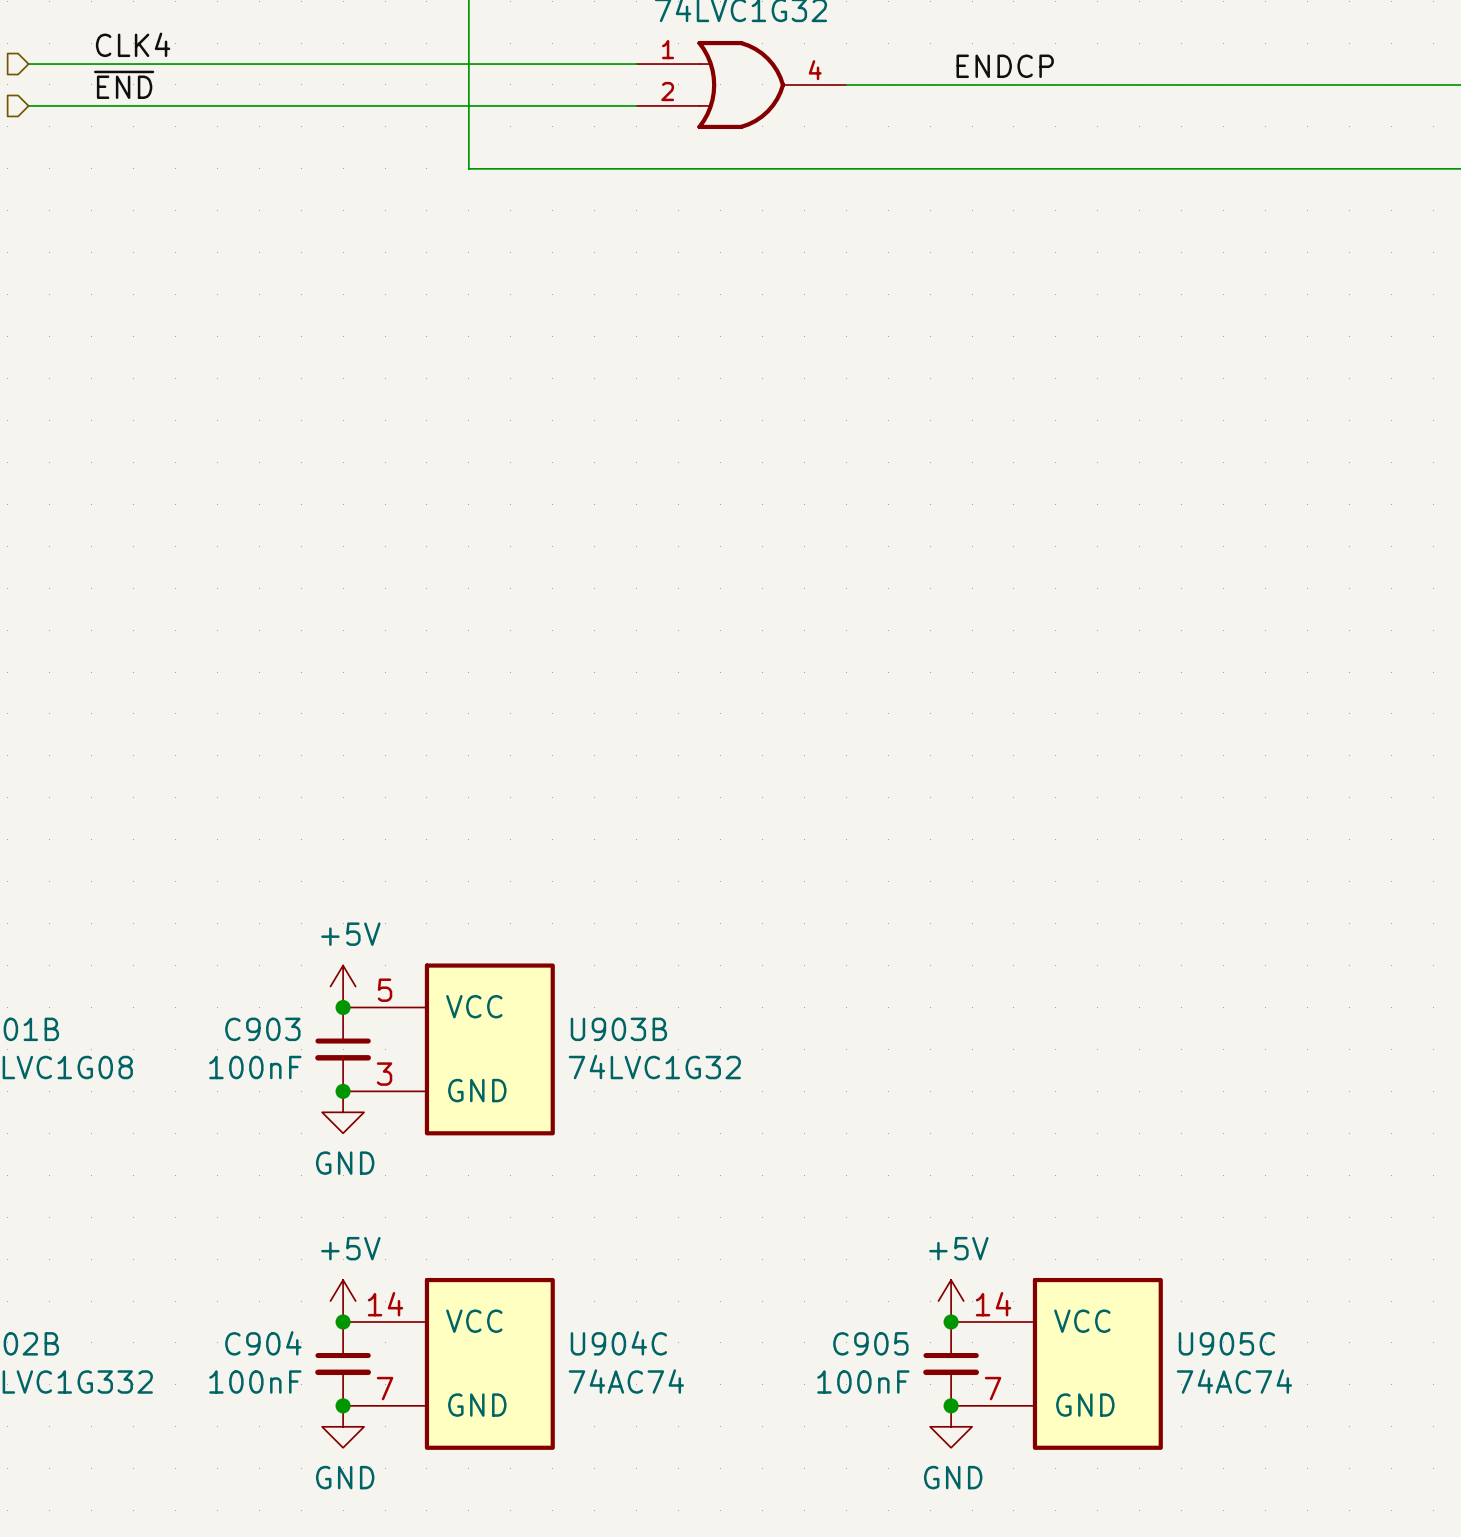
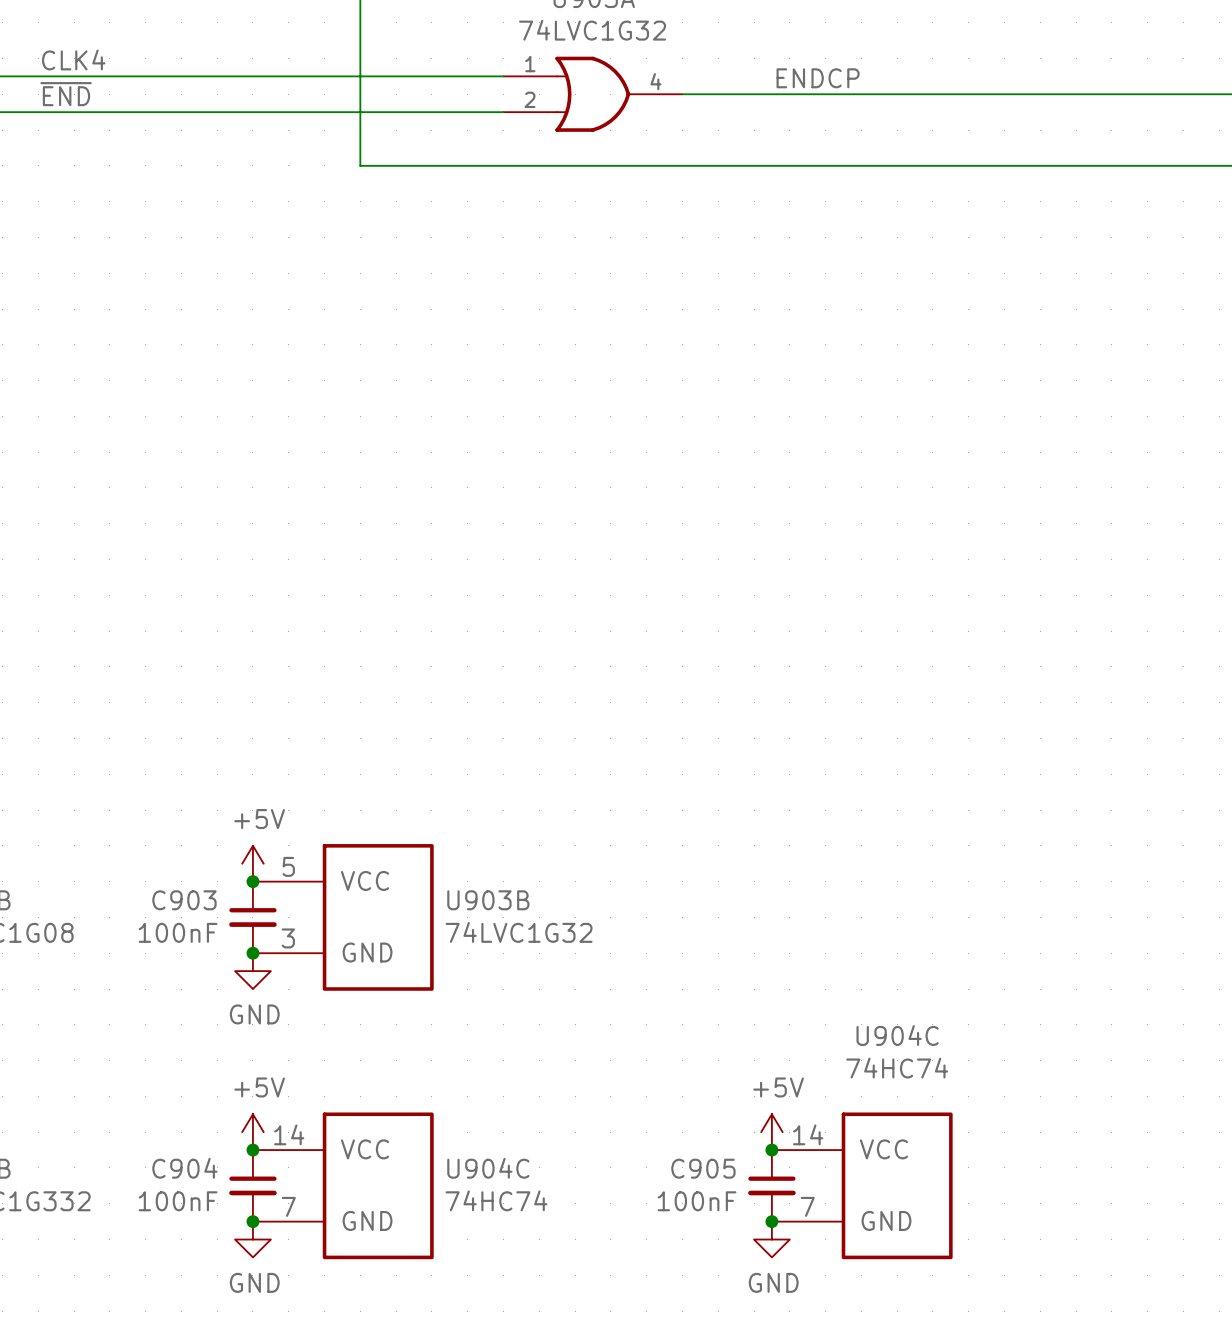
U905C name: U905C (1226, 1343) -> U904C (897, 1035)
U904C value: 74AC74 (626, 1381) -> 74HC74 (496, 1200)
U905C value: 74AC74 (1234, 1381) -> 74HC74 (897, 1068)

